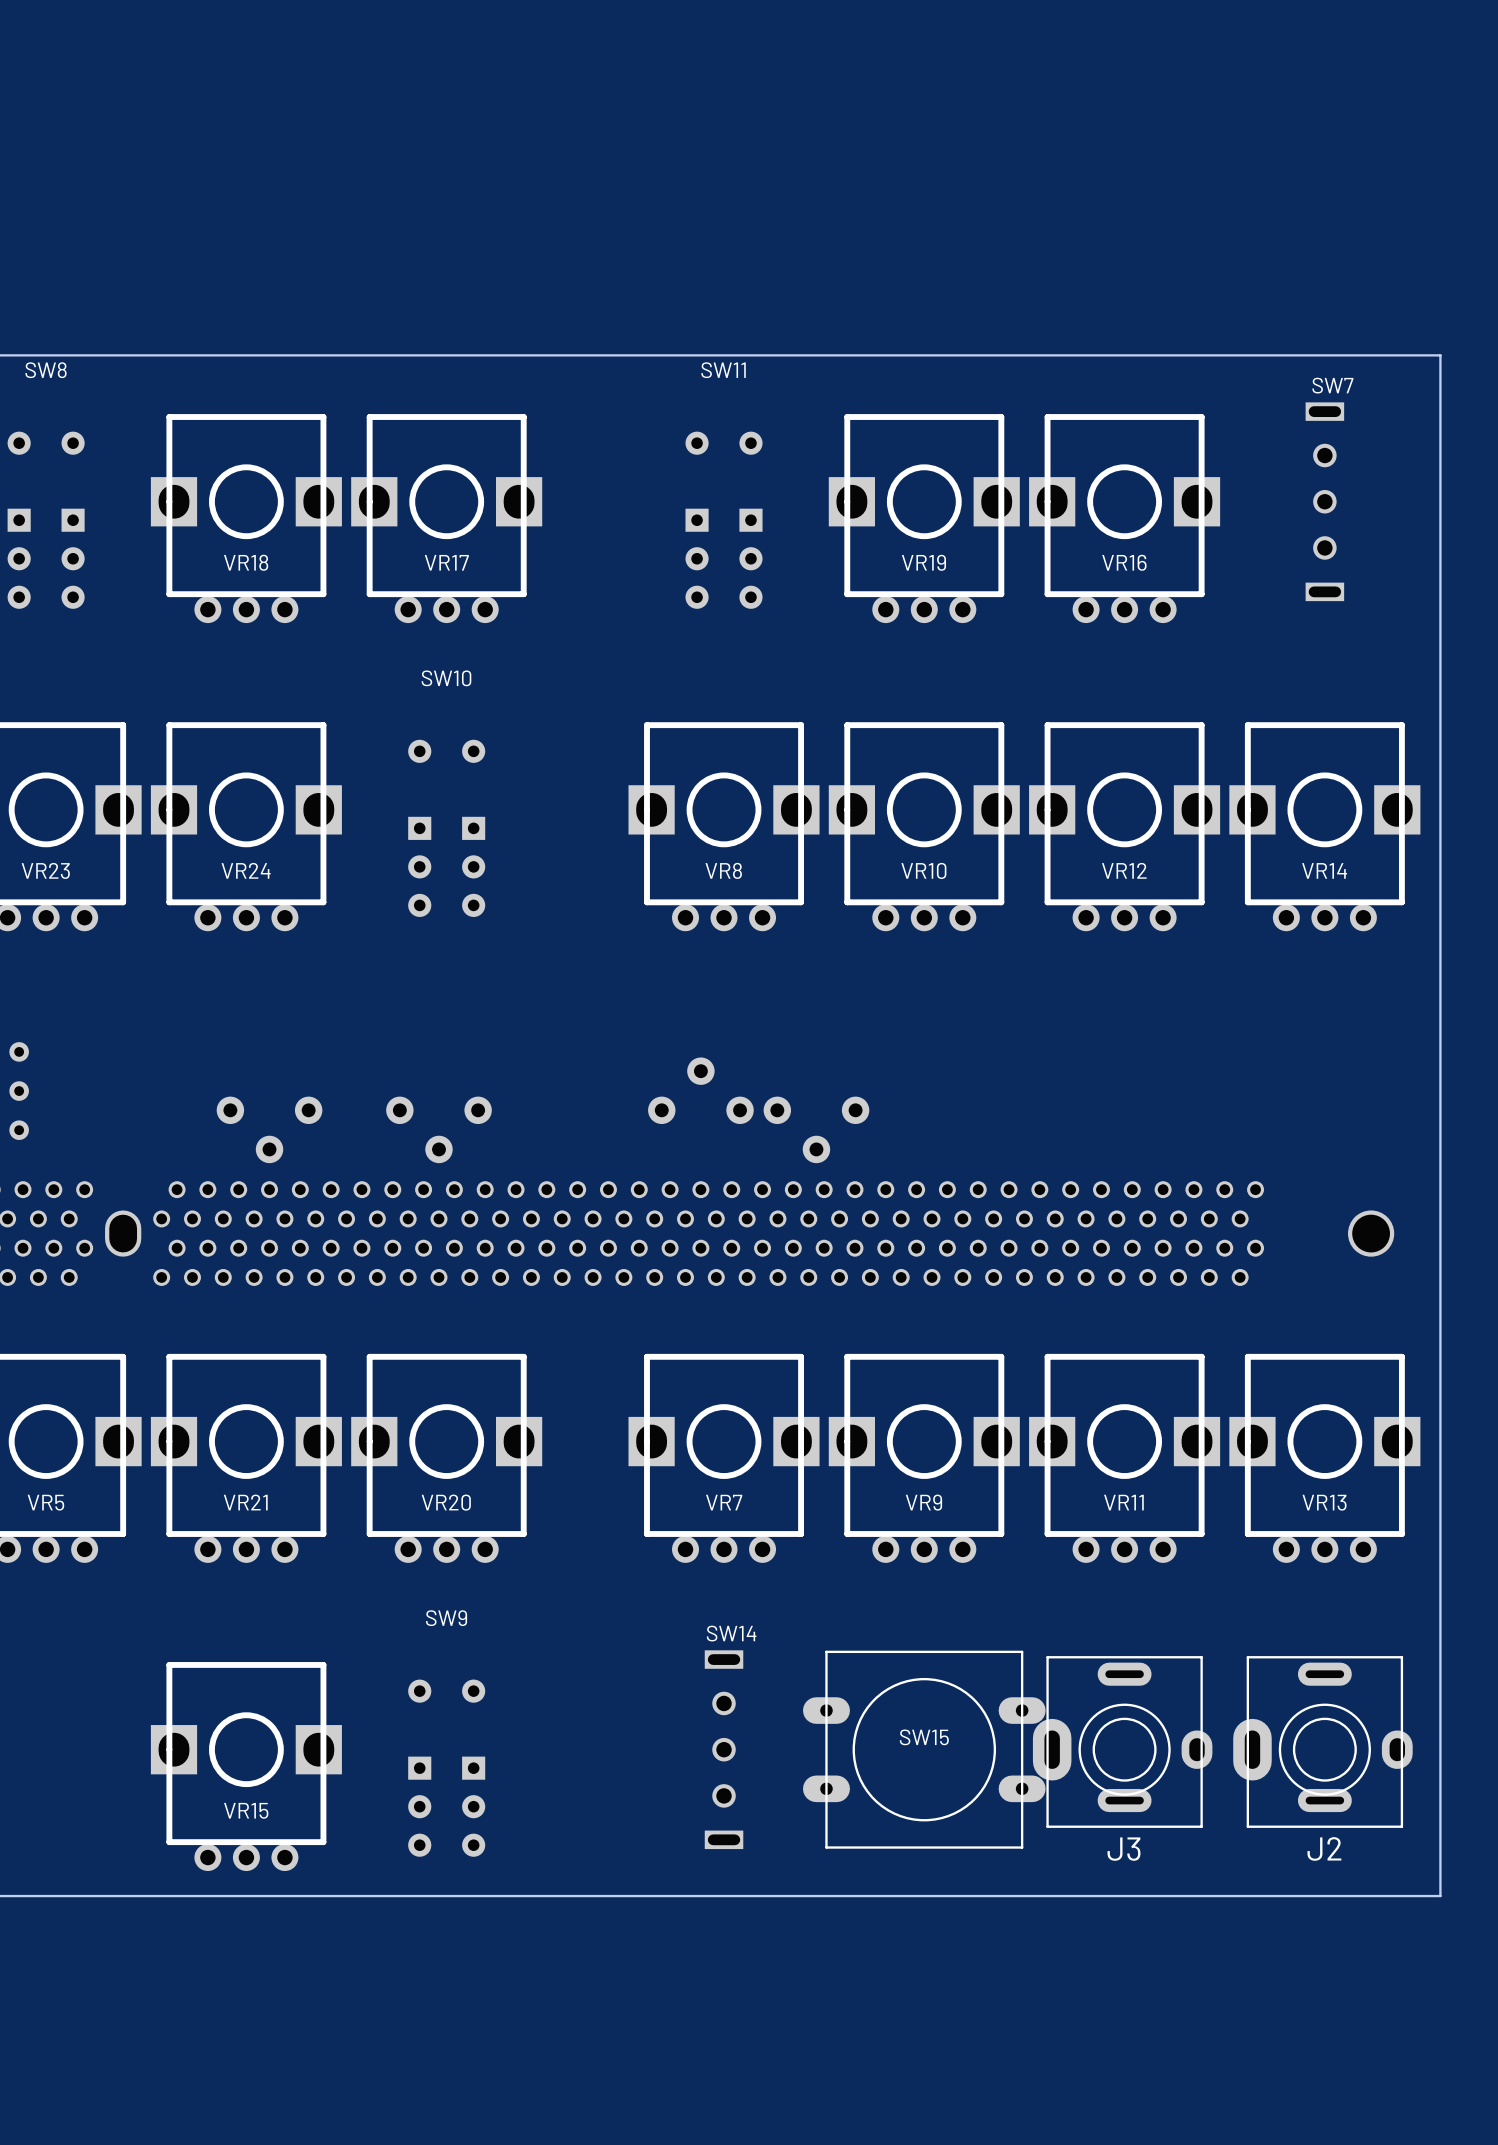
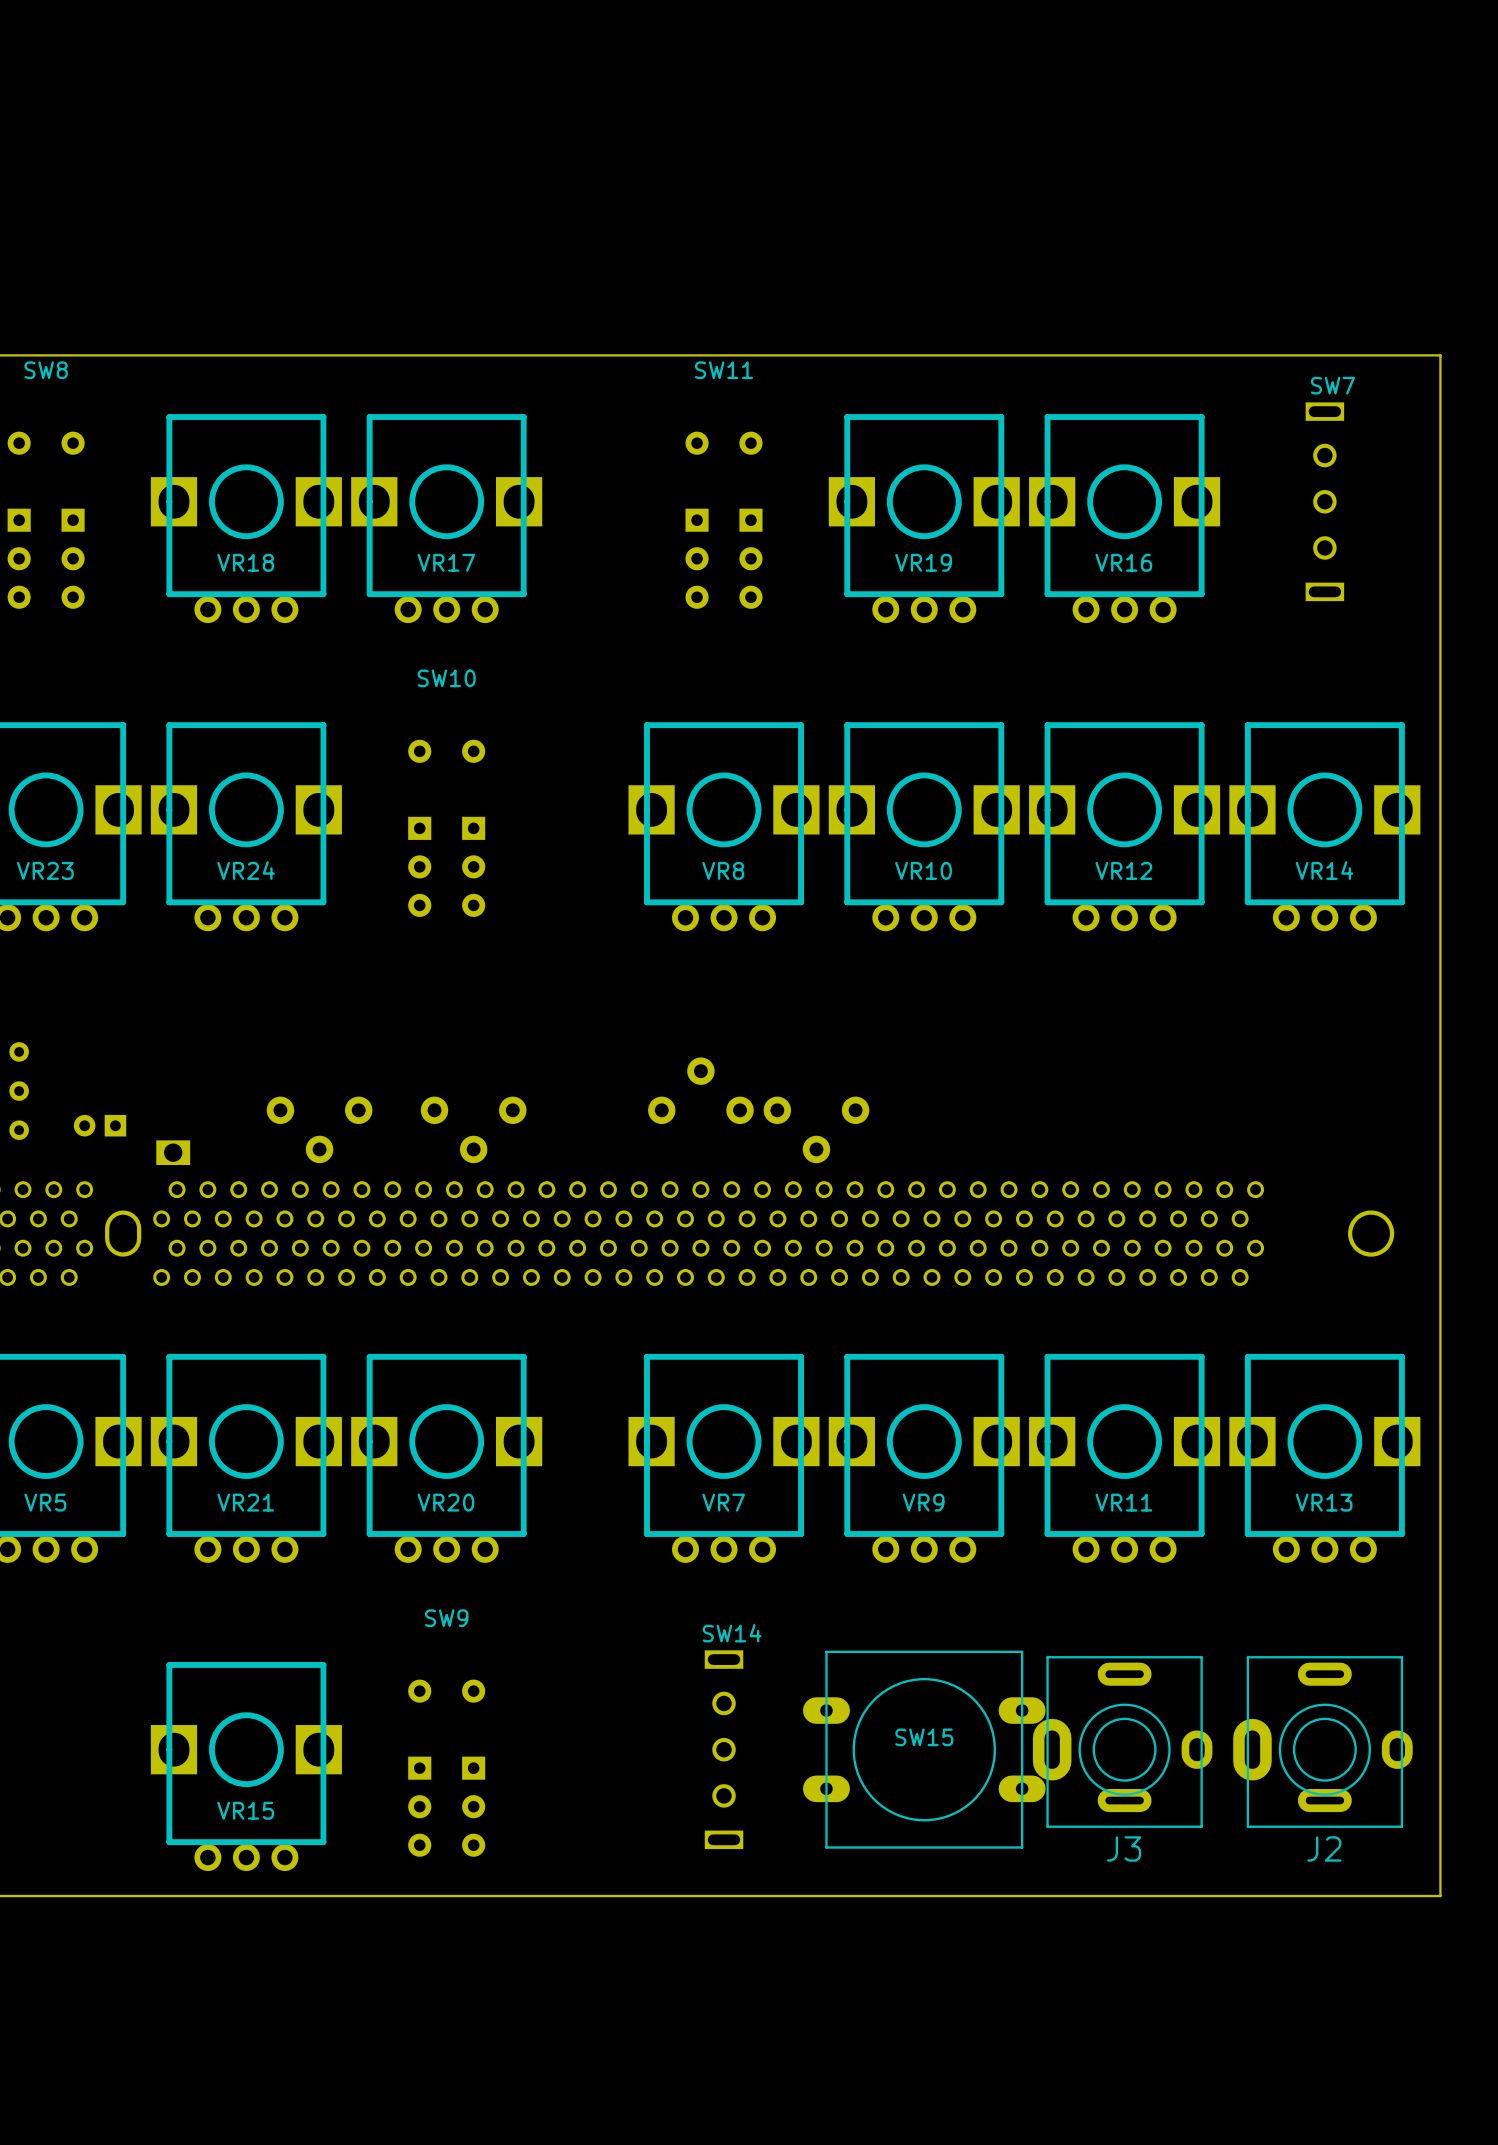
part: none -> (100, 1125)
part position: (269, 1129) -> (319, 1129)
part position: (438, 1129) -> (473, 1129)
part: none -> (173, 1152)

